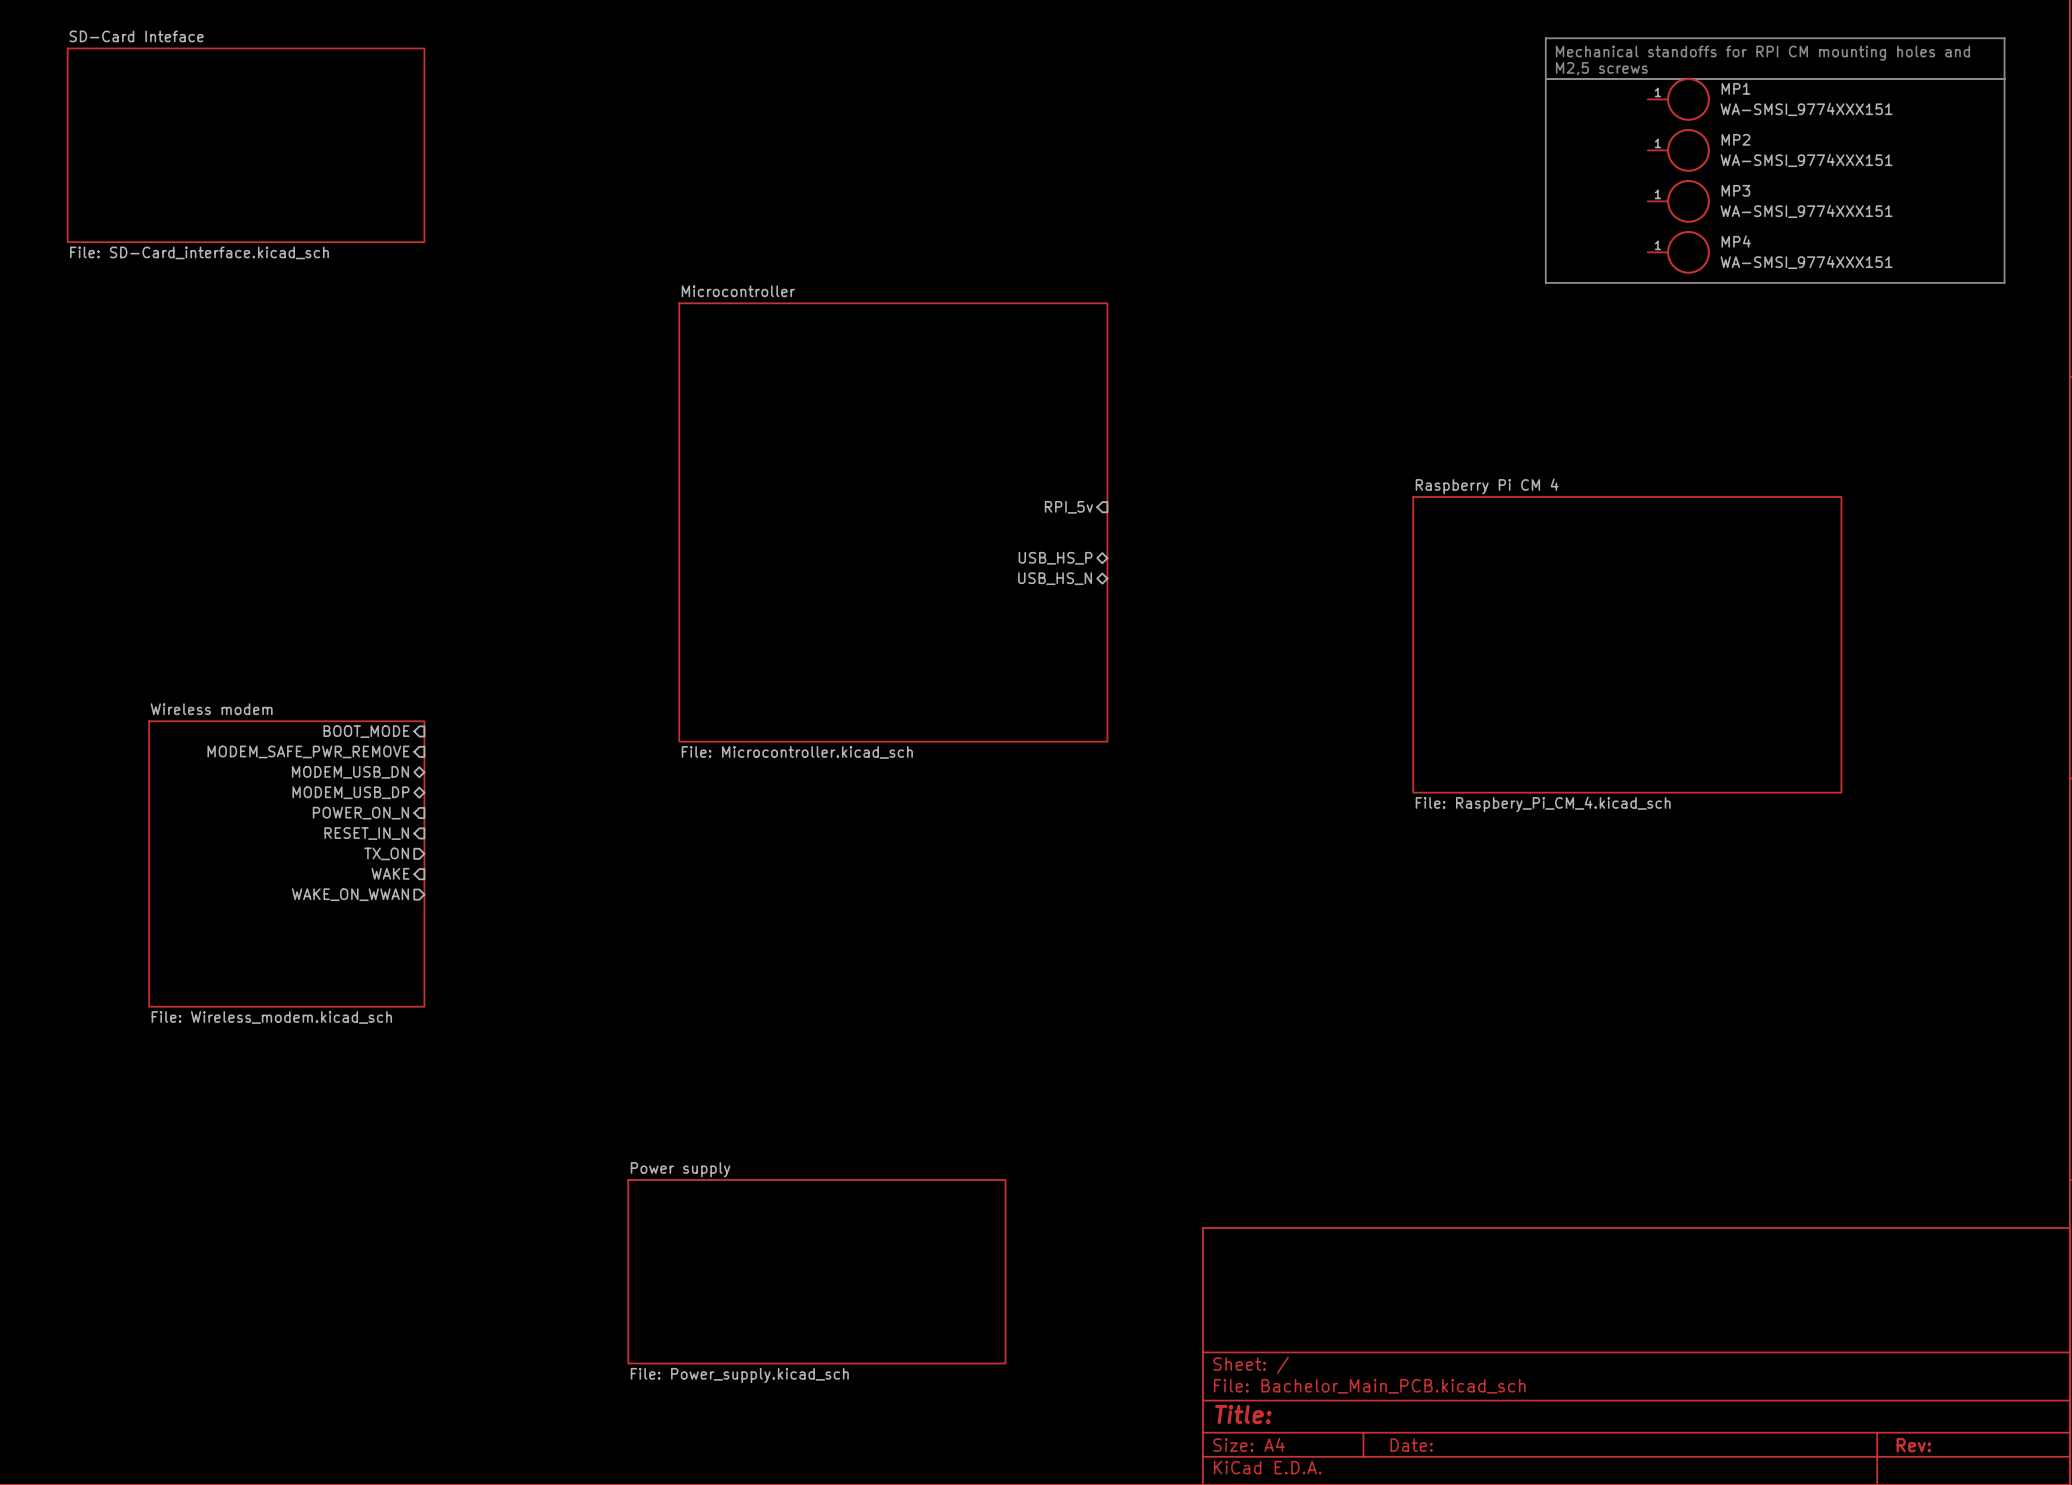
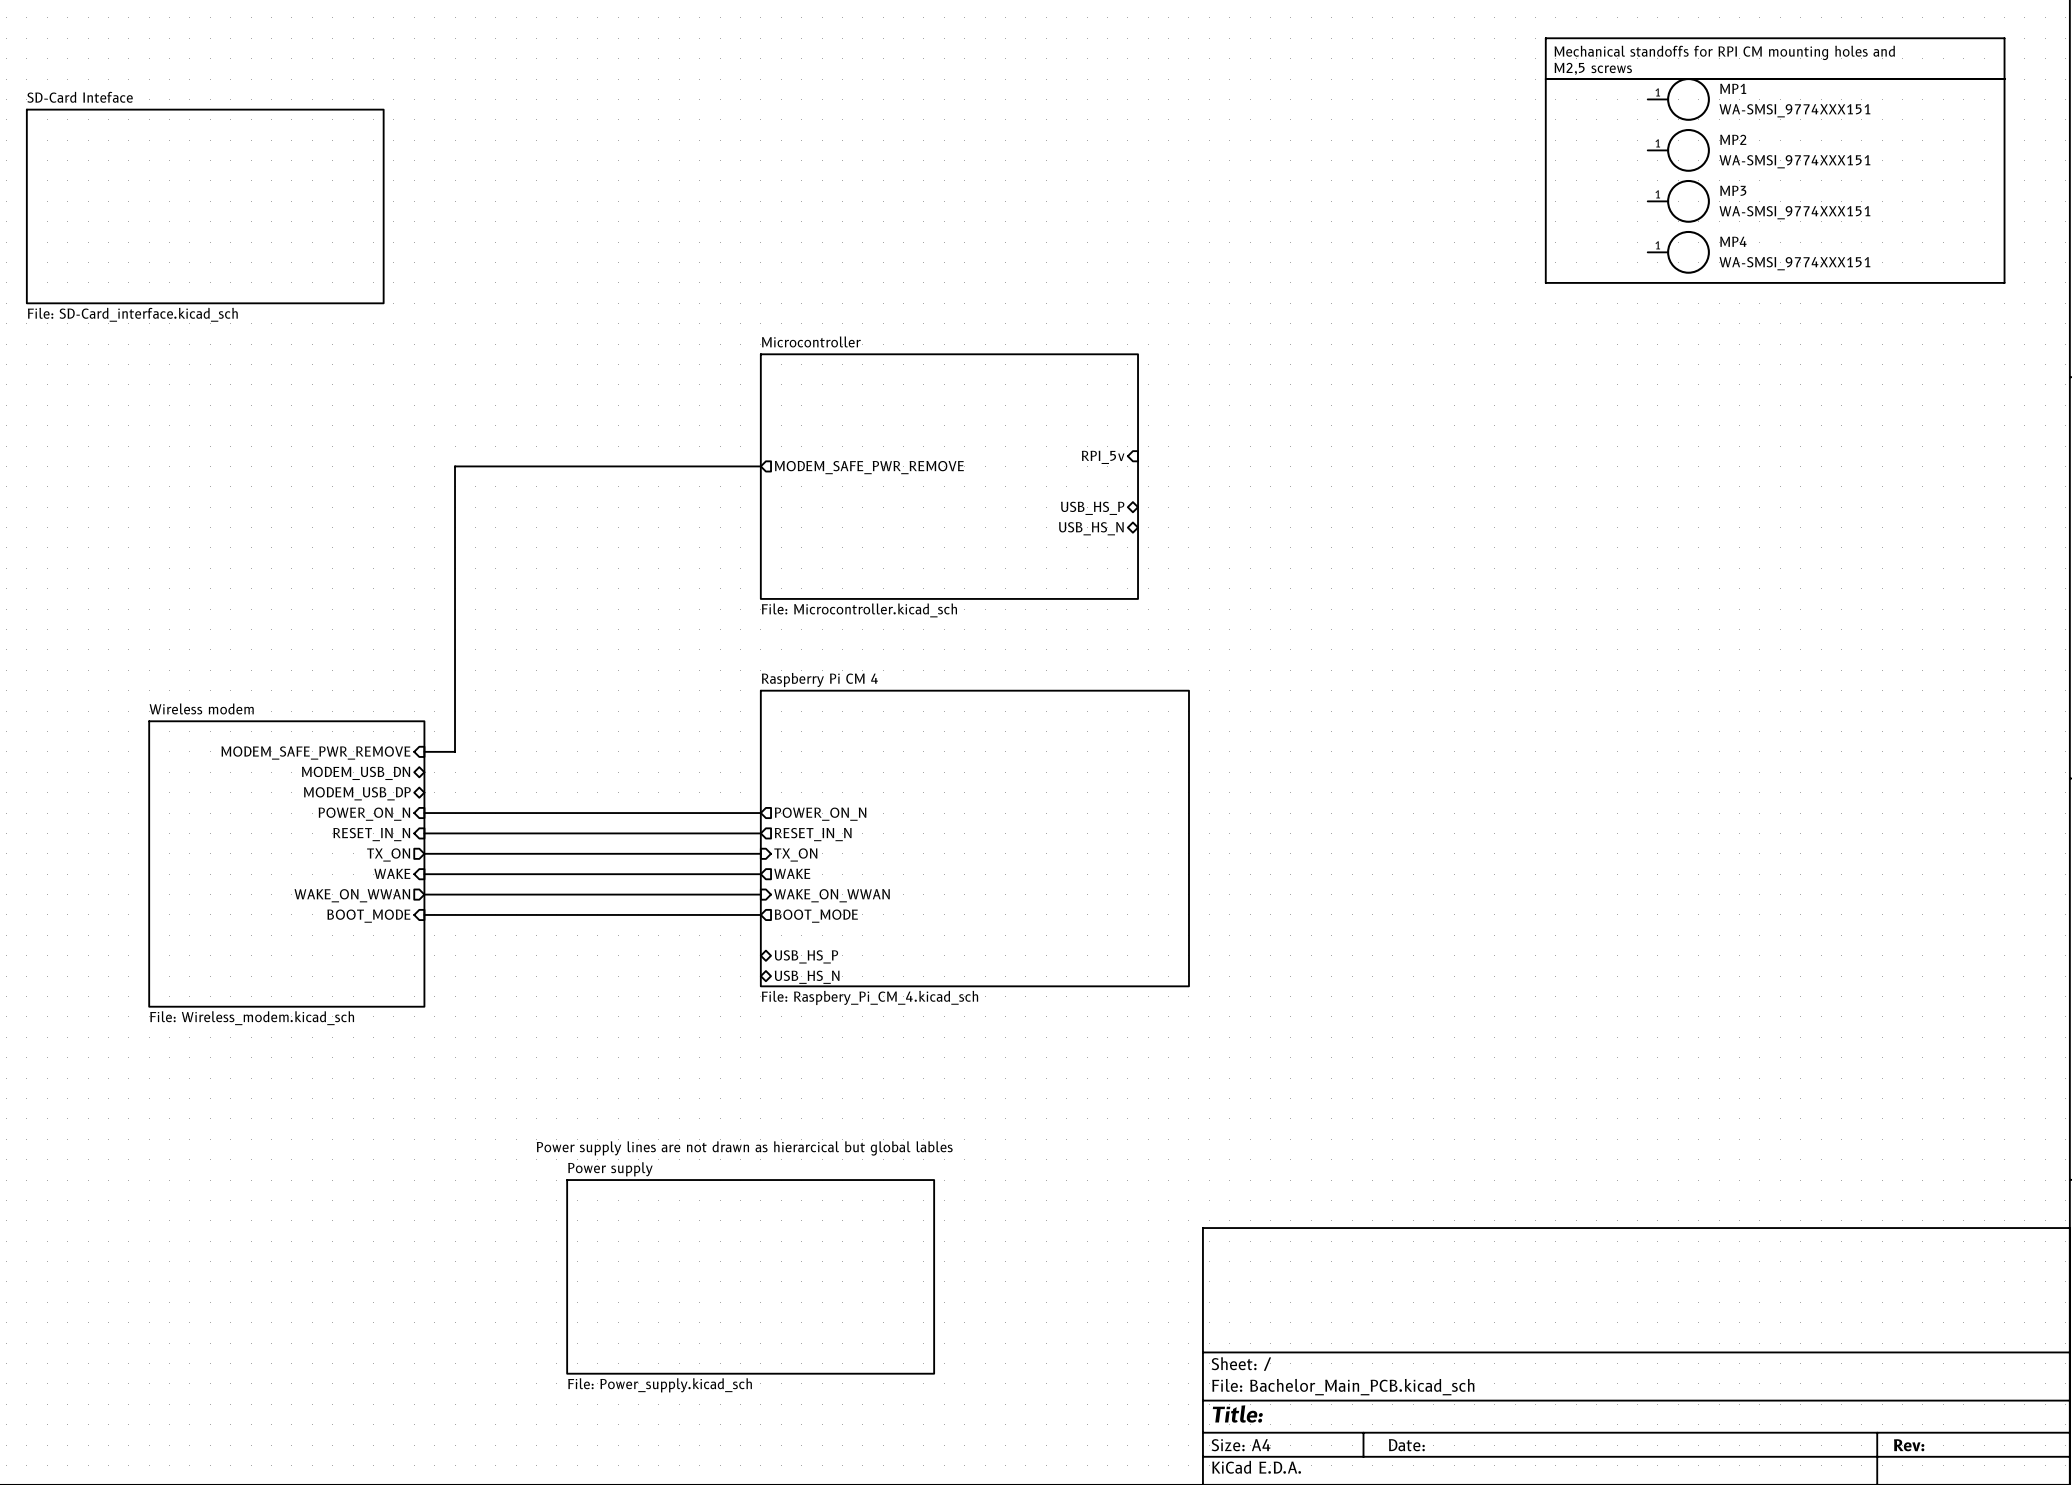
sheet SD-Card Inteface position: (246, 145) -> (205, 206)
wire: none -> (760, 466) (455, 466) (455, 751) (424, 751)
sheet pin: none -> MODEM_SAFE_PWR_REMOVE (869, 467)
sheet Microcontroller: none -> File: Microcontroller.kicad_sch (949, 476)
sheet pin position: RPI_5v (1068, 507) -> RPI_5v (1103, 457)
sheet Microcontroller: File: Microcontroller.kicad_sch (893, 522) -> none
sheet pin position: USB_HS_P (1055, 558) -> USB_HS_P (1092, 508)
sheet pin position: USB_HS_N (1055, 578) -> USB_HS_N (1091, 528)
sheet Raspberry Pi CM 4 position: (1627, 644) -> (974, 838)
sheet pin position: BOOT_MODE (366, 731) -> BOOT_MODE (368, 916)
wire: none -> (424, 813) (760, 813)
sheet pin: none -> POWER_ON_N (820, 814)
wire: none -> (424, 833) (760, 833)
sheet pin: none -> RESET_IN_N (813, 834)
wire: none -> (424, 853) (760, 853)
sheet pin: none -> TX_ON (795, 854)
sheet pin: none -> WAKE (792, 873)
wire: none -> (424, 874) (760, 874)
wire: none -> (424, 894) (760, 894)
sheet pin: none -> WAKE_ON_WWAN (832, 895)
wire: none -> (424, 914) (760, 914)
sheet pin: none -> BOOT_MODE (816, 916)
sheet pin: none -> USB_HS_P (806, 956)
sheet pin: none -> USB_HS_N (807, 977)
text: none -> Power supply lines are not drawn as hierarcical but global lables (744, 1148)
sheet Power supply: File: Power_supply.kicad_sch (816, 1271) -> none
sheet Power supply: none -> File: Power_supply.kicad_sch (750, 1276)

